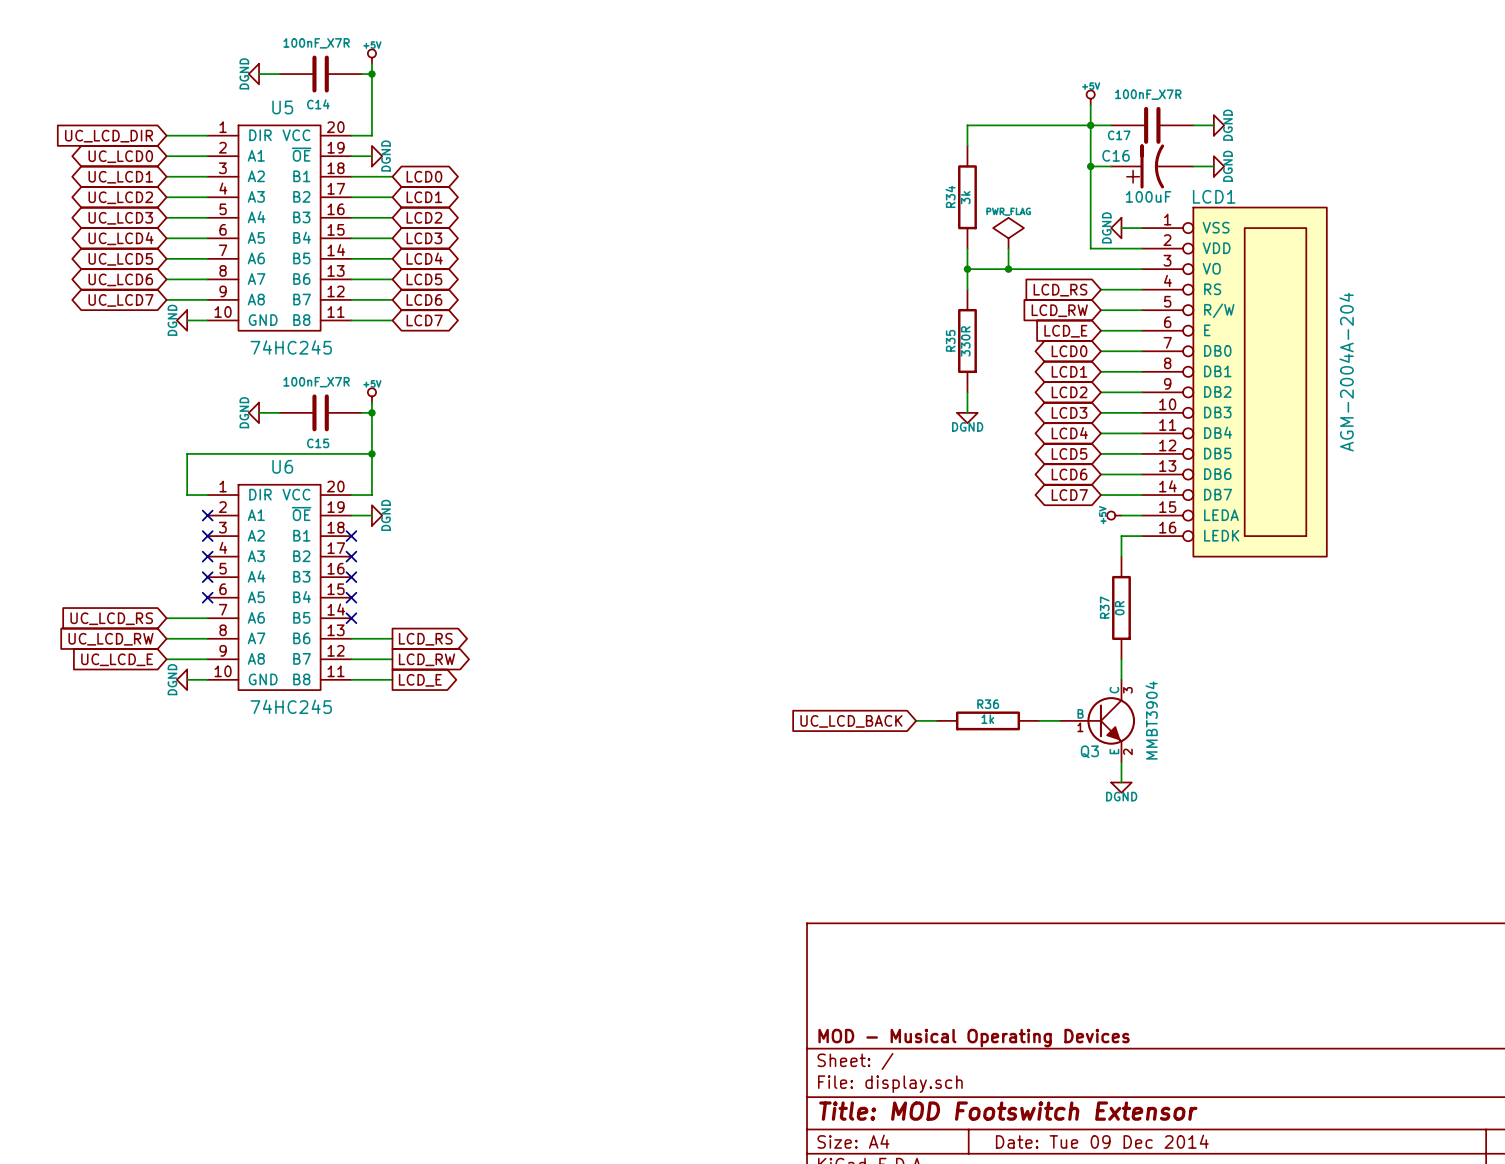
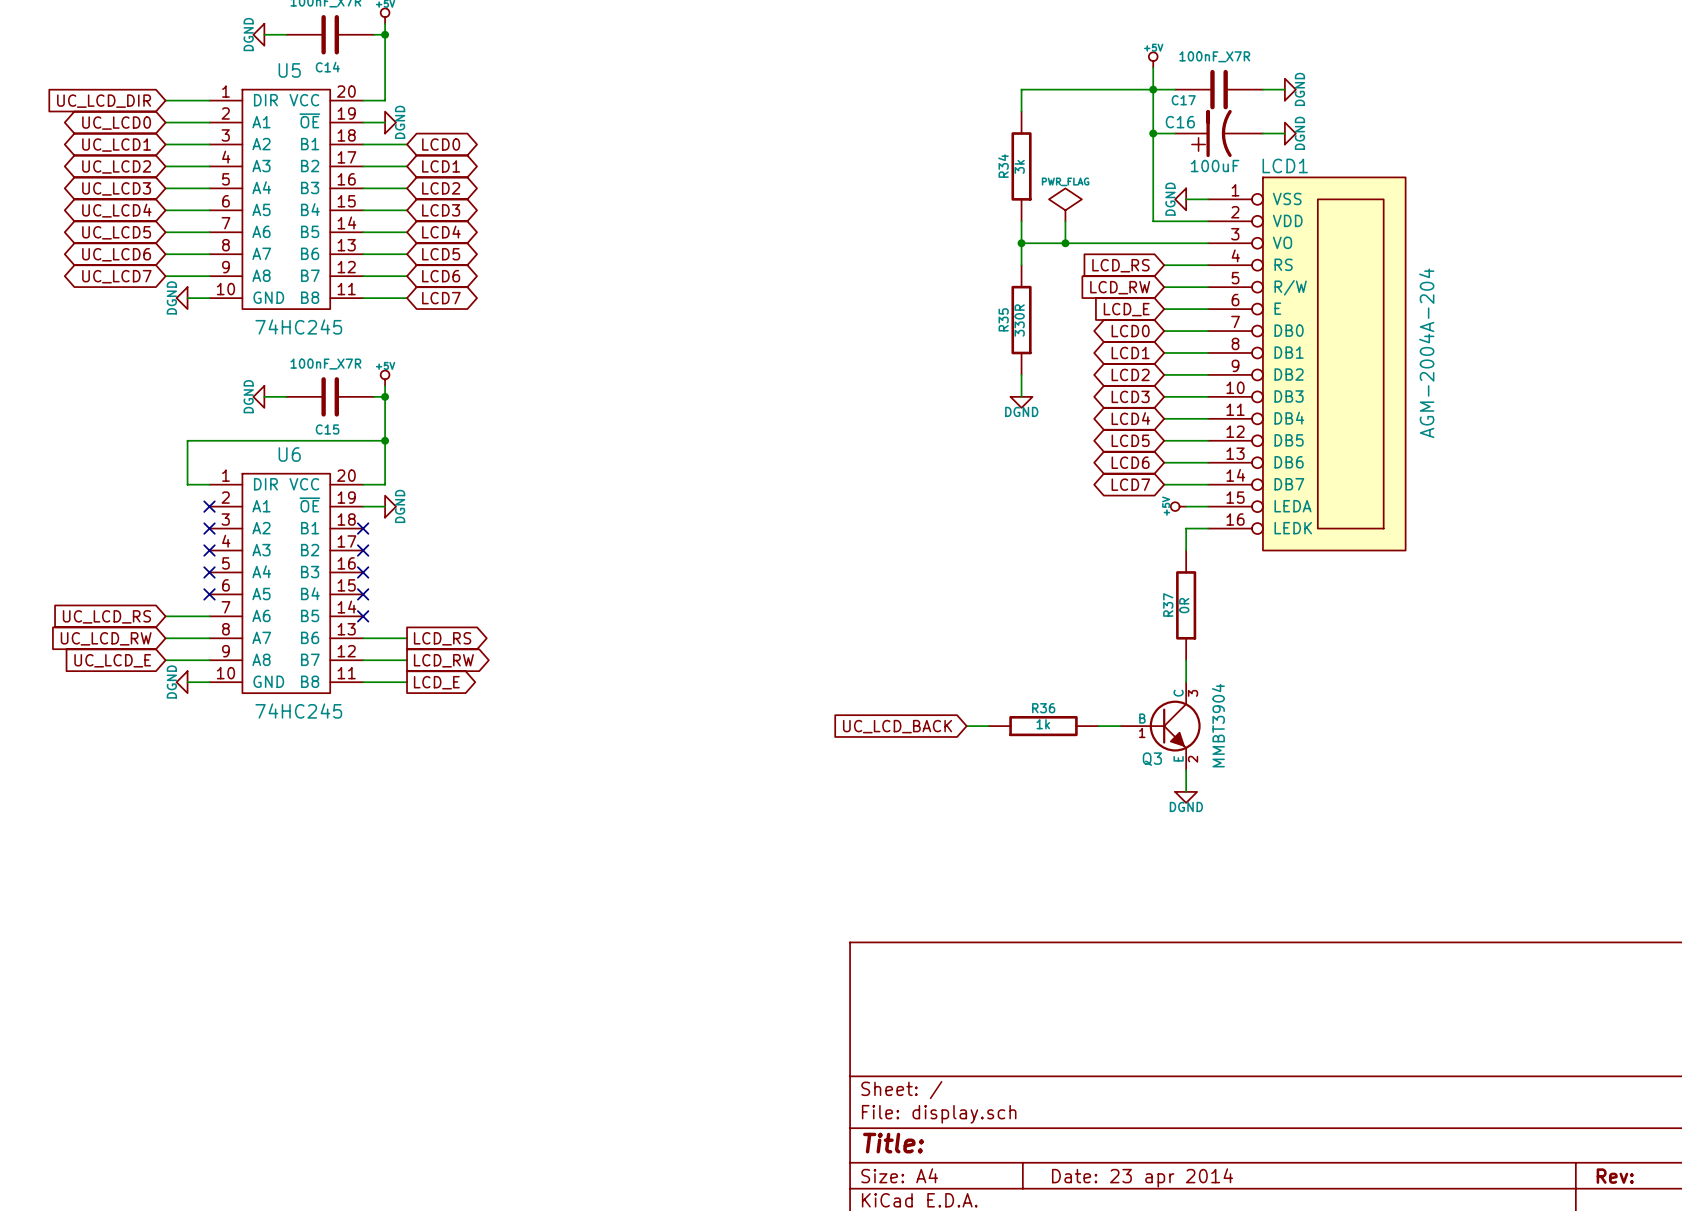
title block: MOD - Musical Operating Devices (974, 1038) -> none
title block: Title: MOD Footswitch Extensor (1008, 1111) -> Title: (893, 1143)
title block: Date: Tue 09 Dec 2014 (1102, 1141) -> Date: 23 apr 2014 (1142, 1177)

